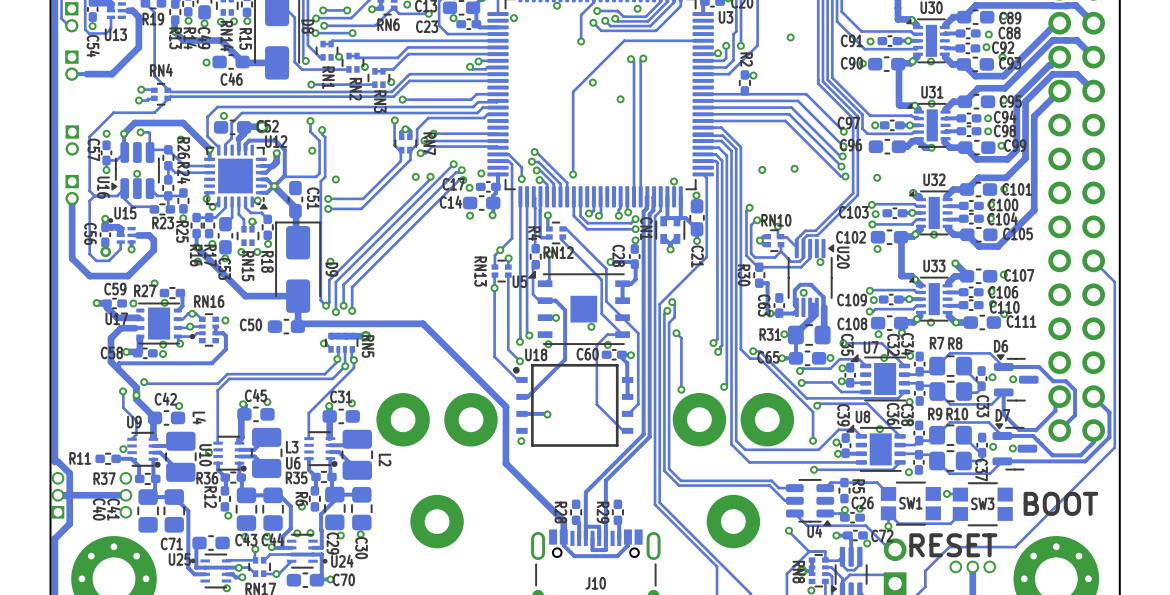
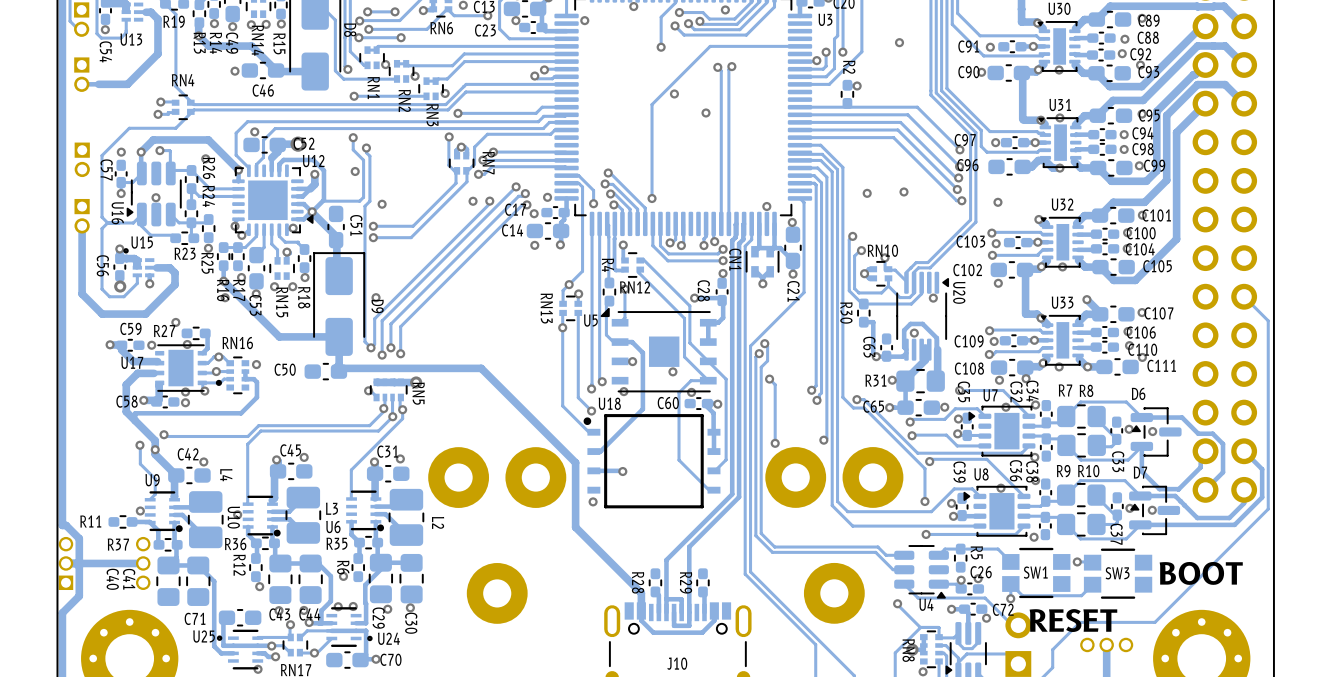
U30 footprint: [906, 18, 950, 64] -> [1037, 21, 1081, 72]
U31 footprint: [906, 103, 951, 148] -> [1038, 117, 1082, 169]
U12 footprint: [204, 144, 268, 210] -> [232, 164, 314, 237]
U32 footprint: [908, 190, 953, 236] -> [1040, 216, 1084, 268]
U33 footprint: [908, 276, 953, 322] -> [1040, 314, 1084, 366]
U7 footprint: [850, 354, 911, 402] -> [968, 405, 1036, 457]
D6 footprint: [993, 354, 1039, 402] -> [1130, 407, 1182, 457]
D7 footprint: [992, 423, 1038, 471] -> [1129, 485, 1181, 536]
U8 footprint: [846, 424, 906, 472] -> [963, 485, 1031, 537]

